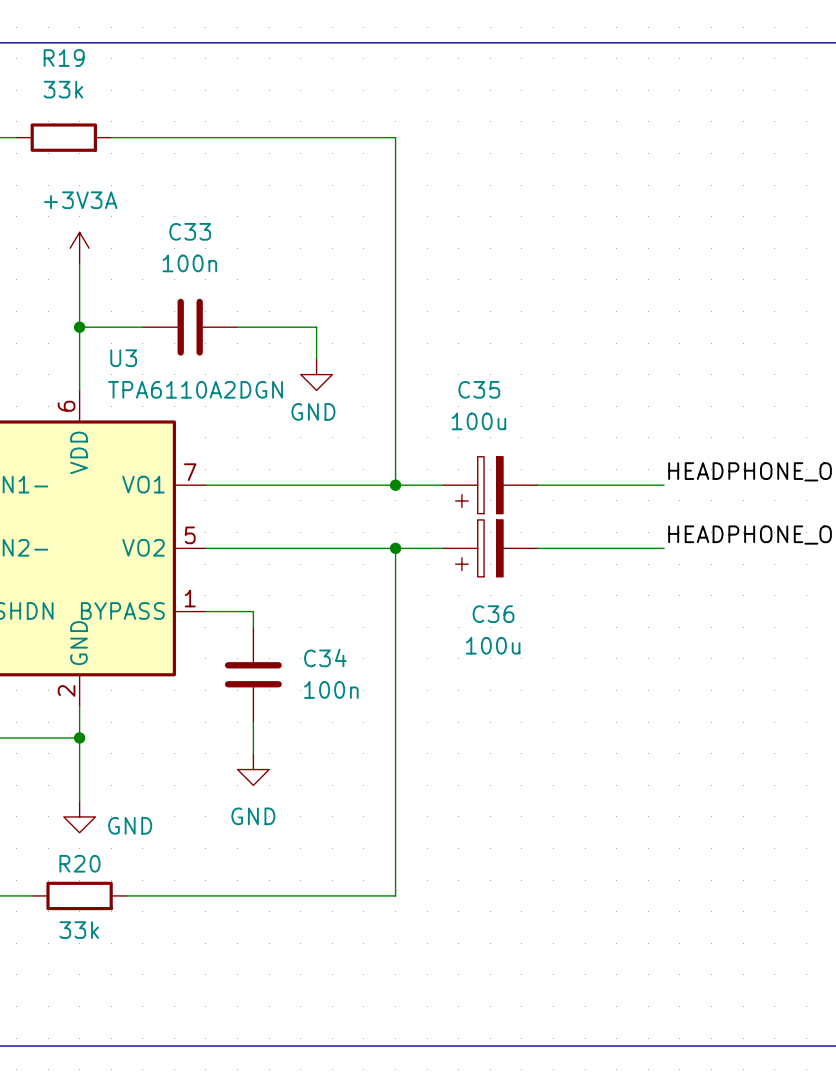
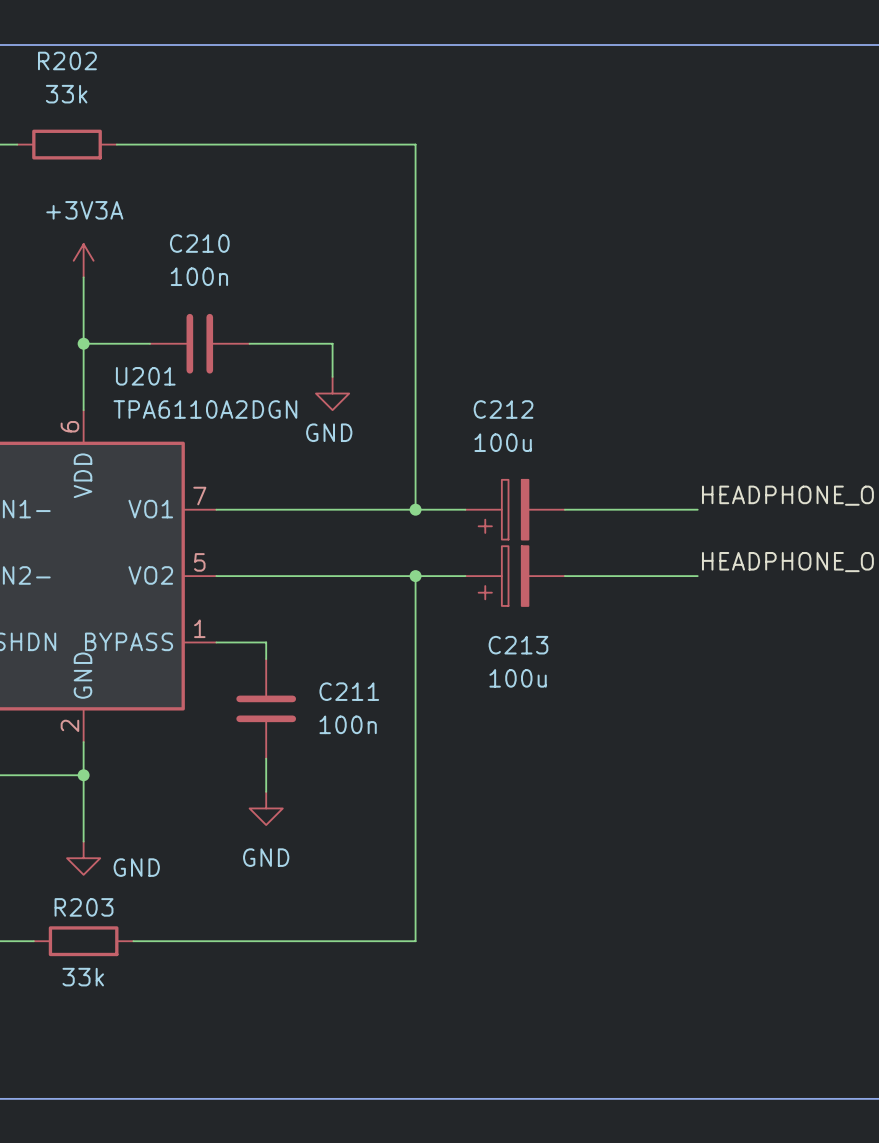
R19 name: R19 (64, 58) -> R202 (67, 60)
C33 name: C33 (190, 231) -> C210 (199, 243)
U3 name: U3 (123, 358) -> U201 (145, 376)
C35 name: C35 (479, 389) -> C212 (503, 409)
C36 name: C36 (493, 614) -> C213 (518, 645)
C34 name: C34 (325, 658) -> C211 (349, 691)
R20 name: R20 (79, 863) -> R203 (84, 907)

